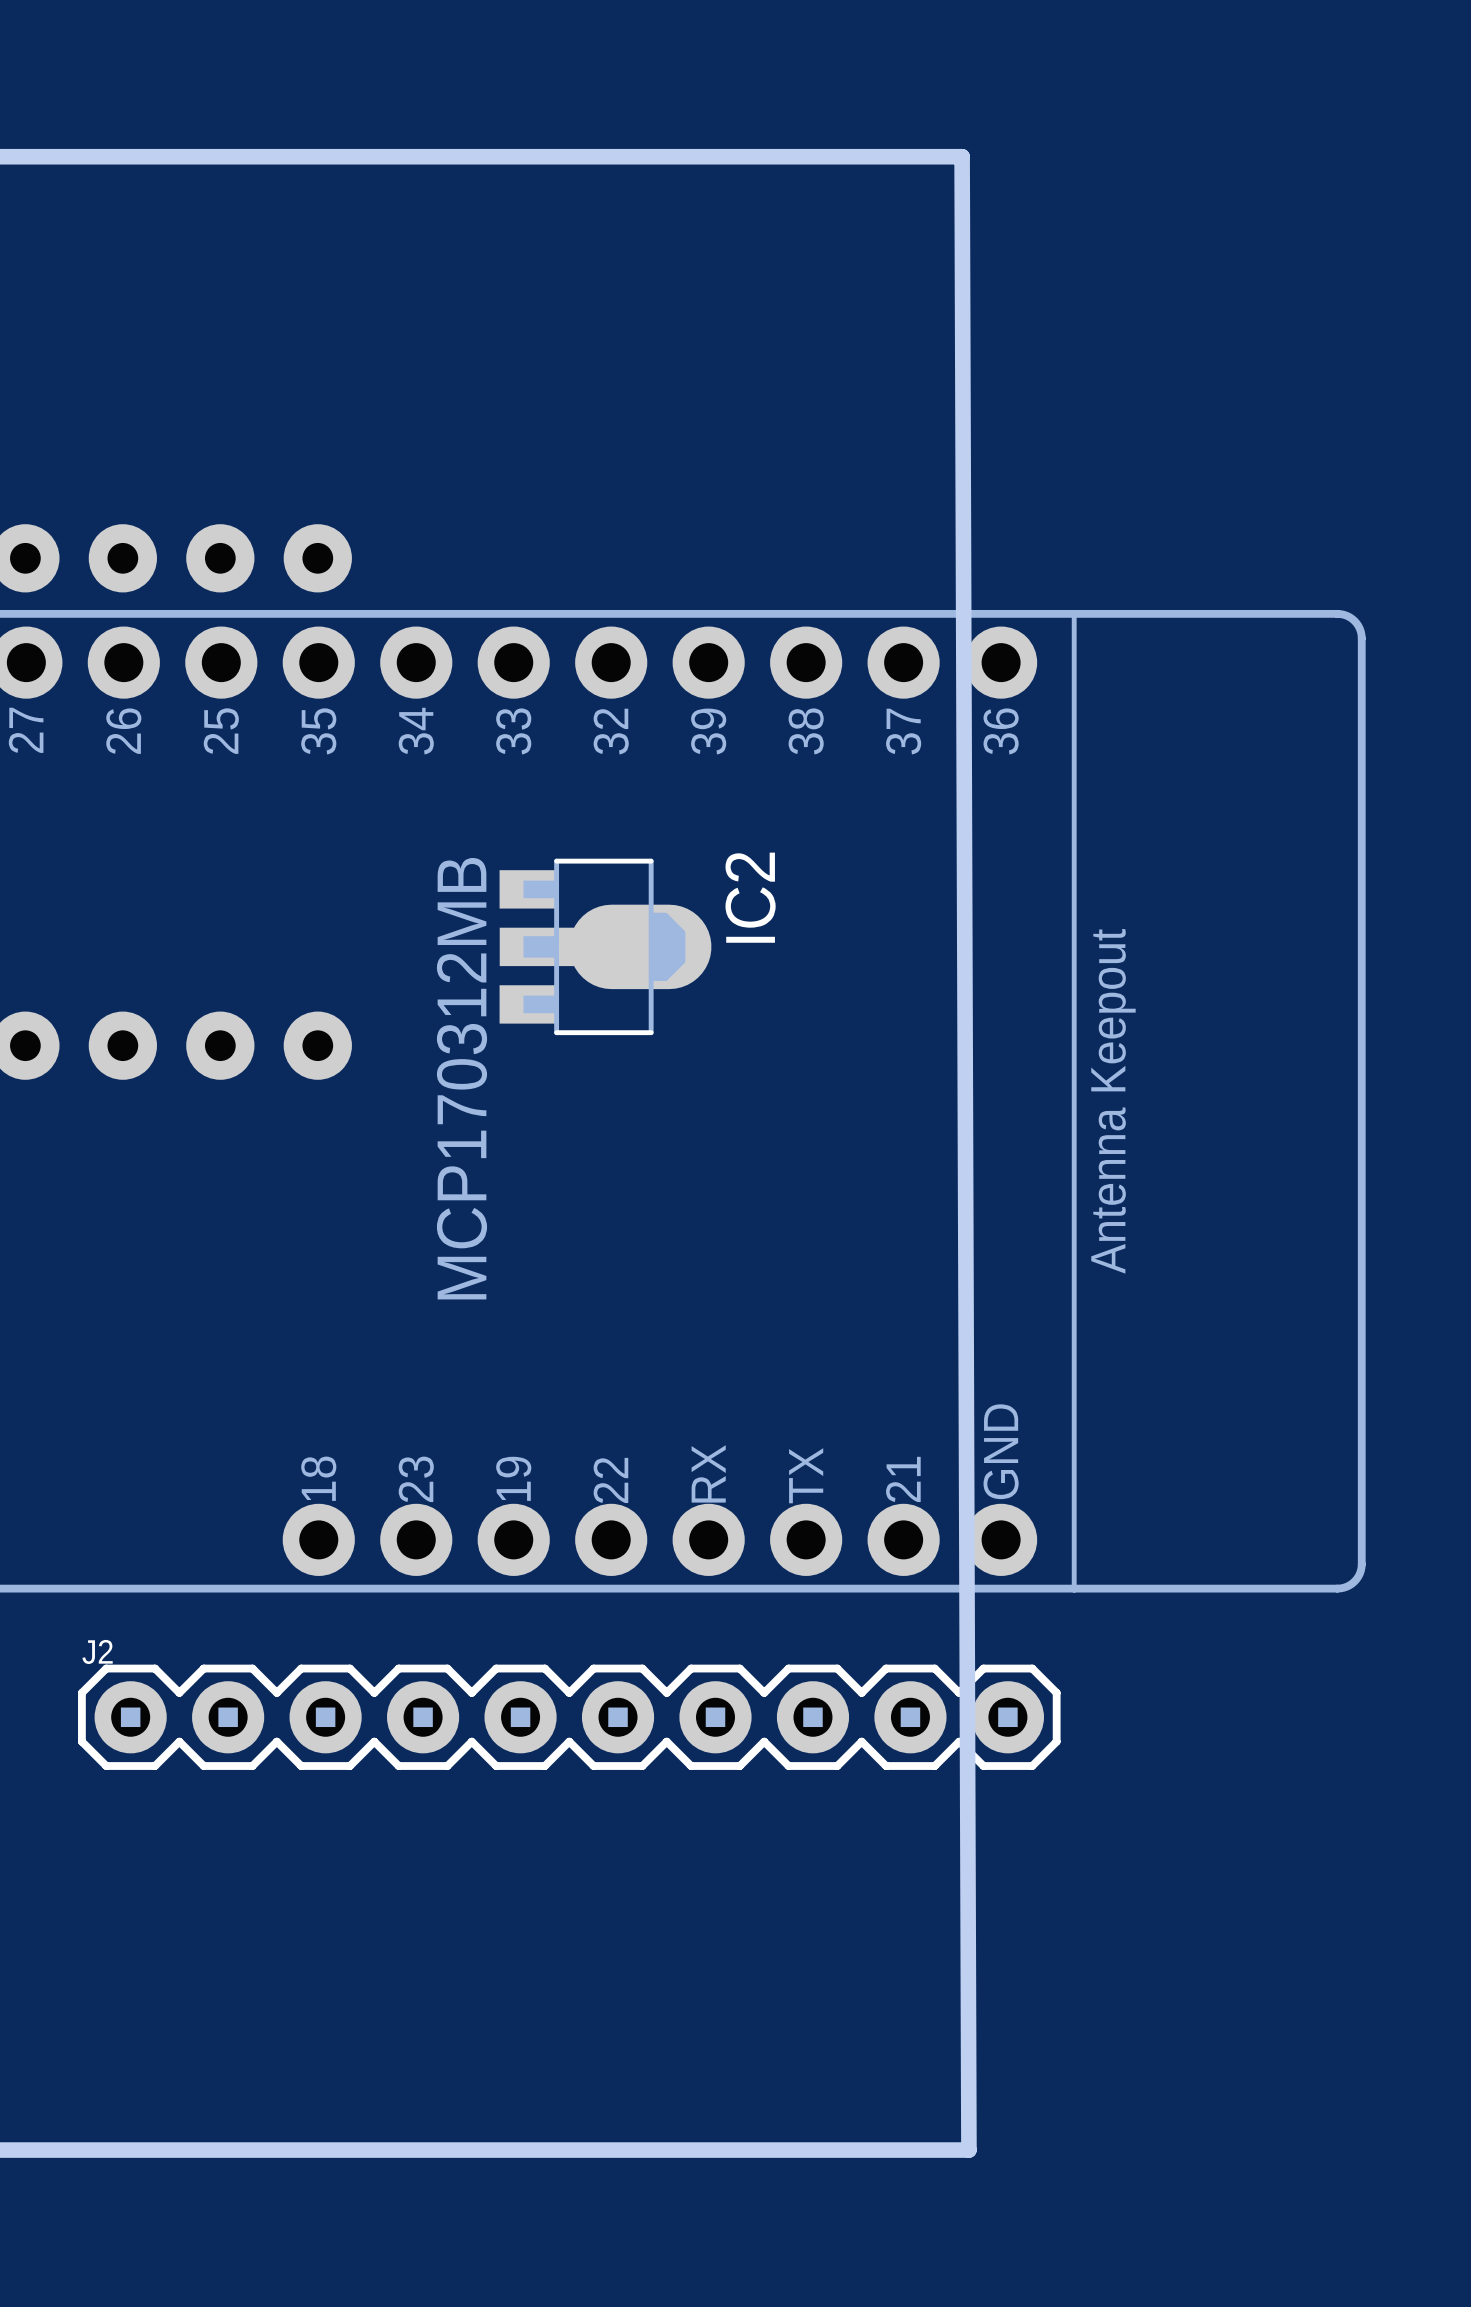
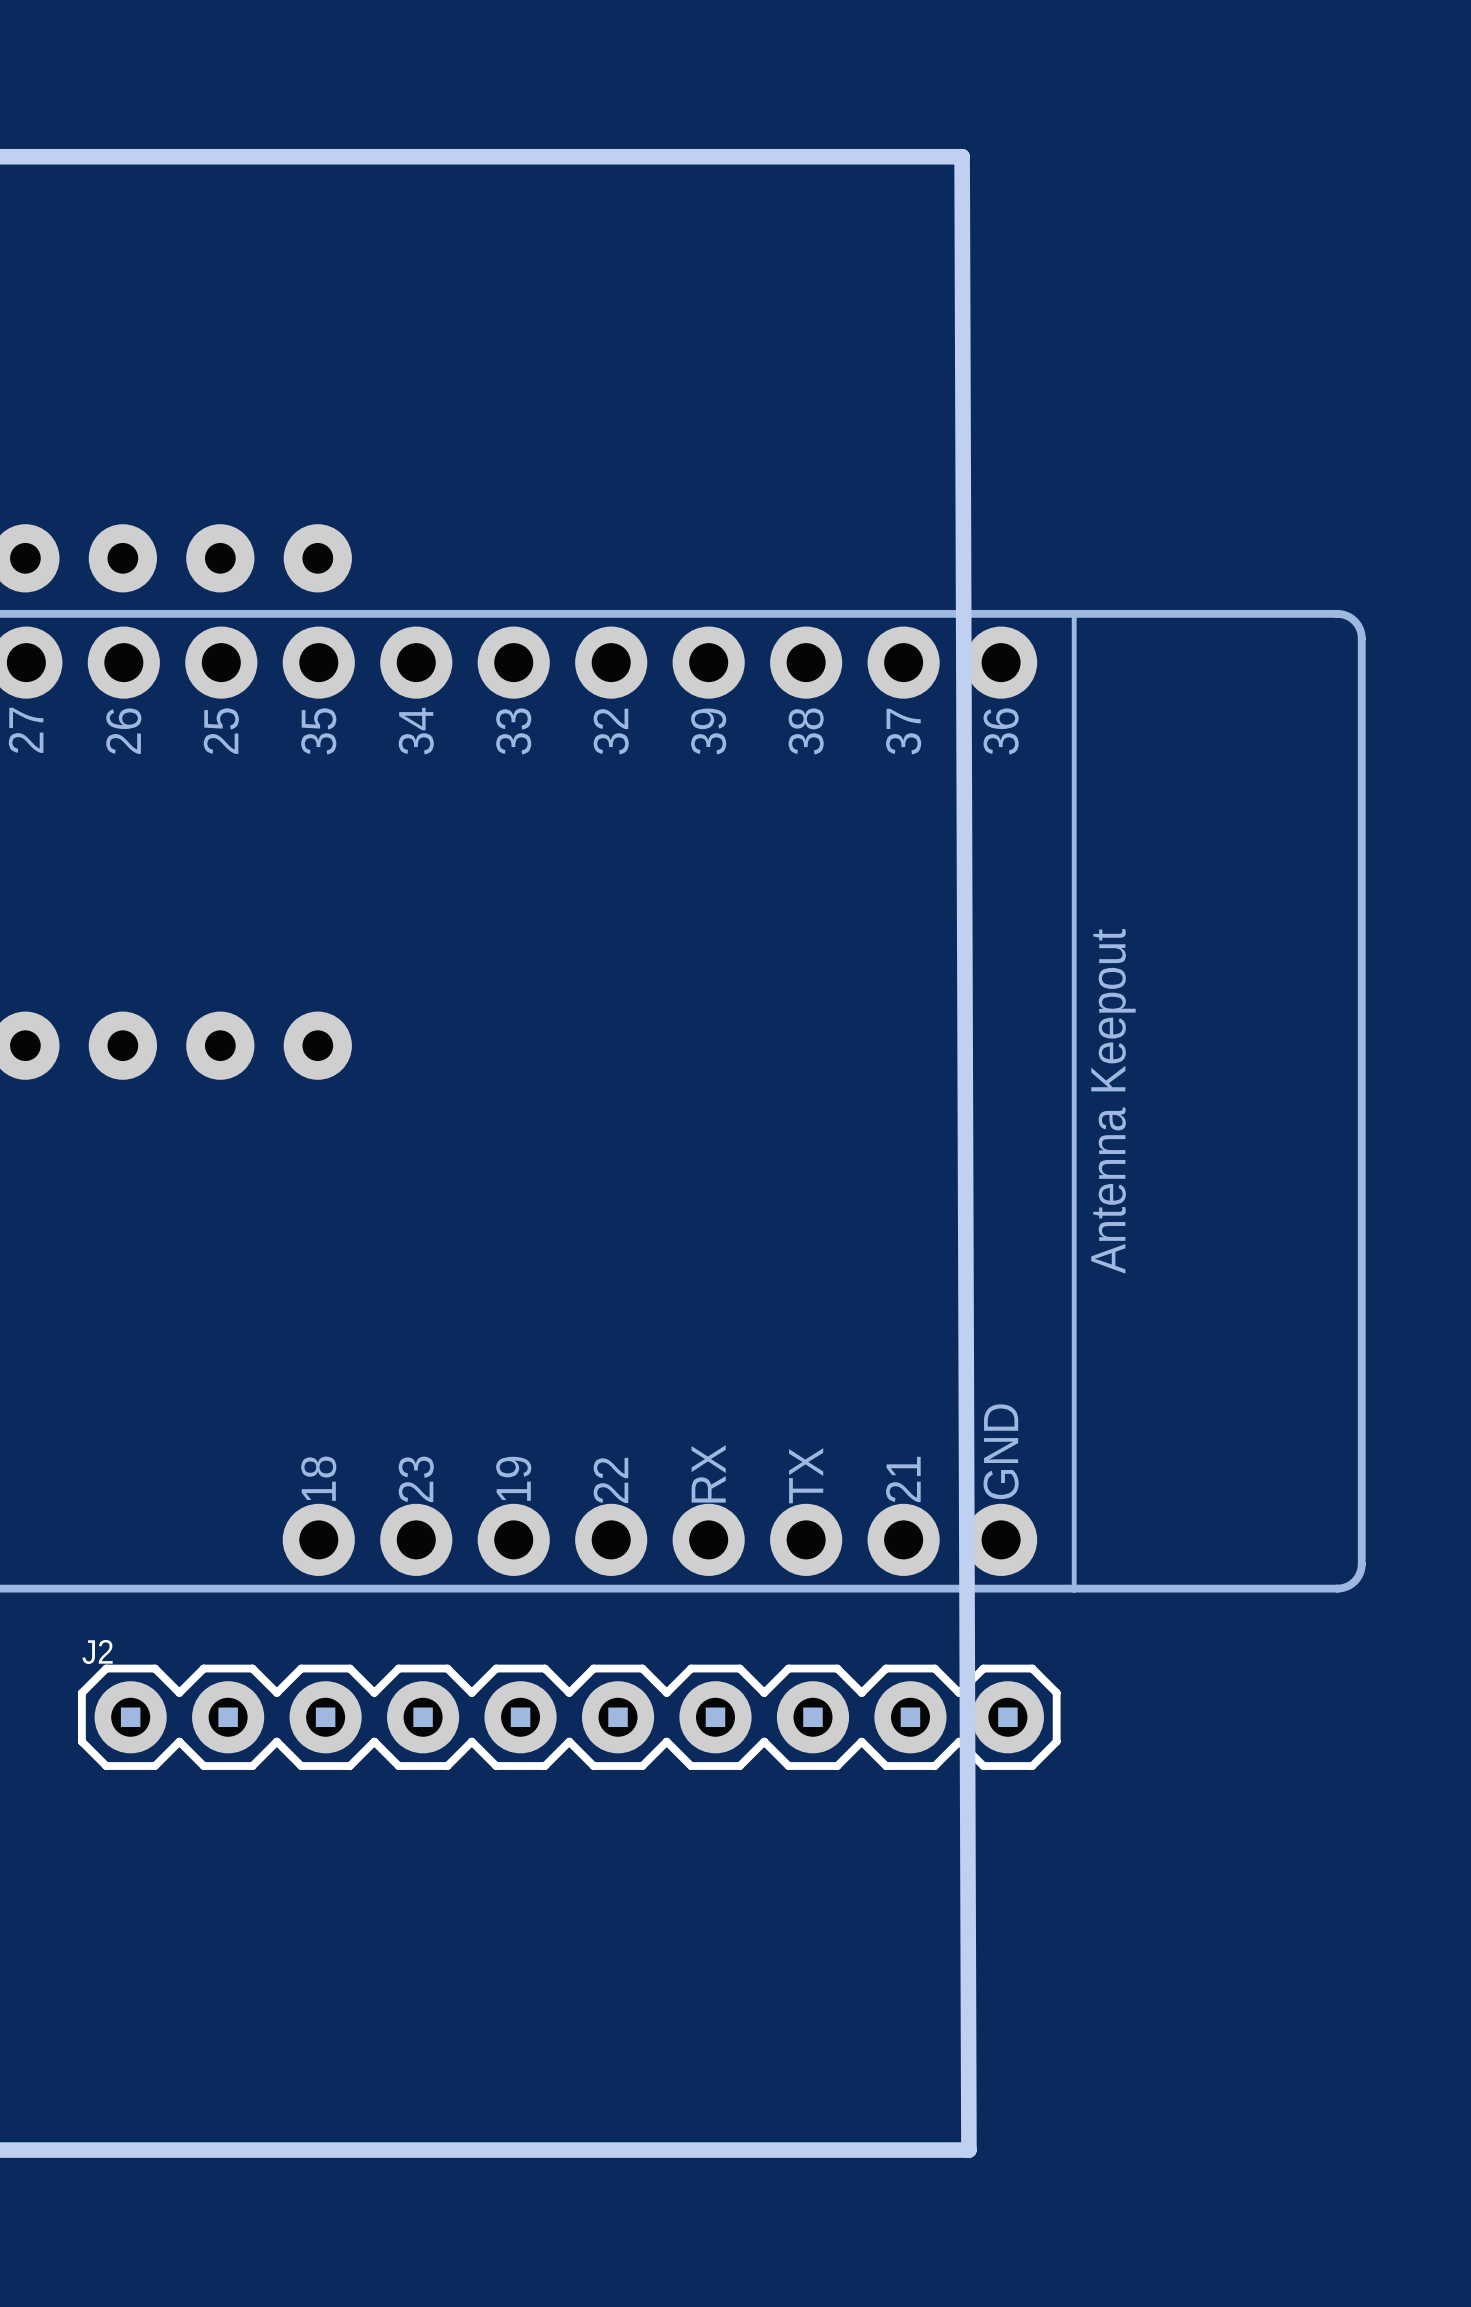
IC2: MCP170312MB (605, 946) -> none

